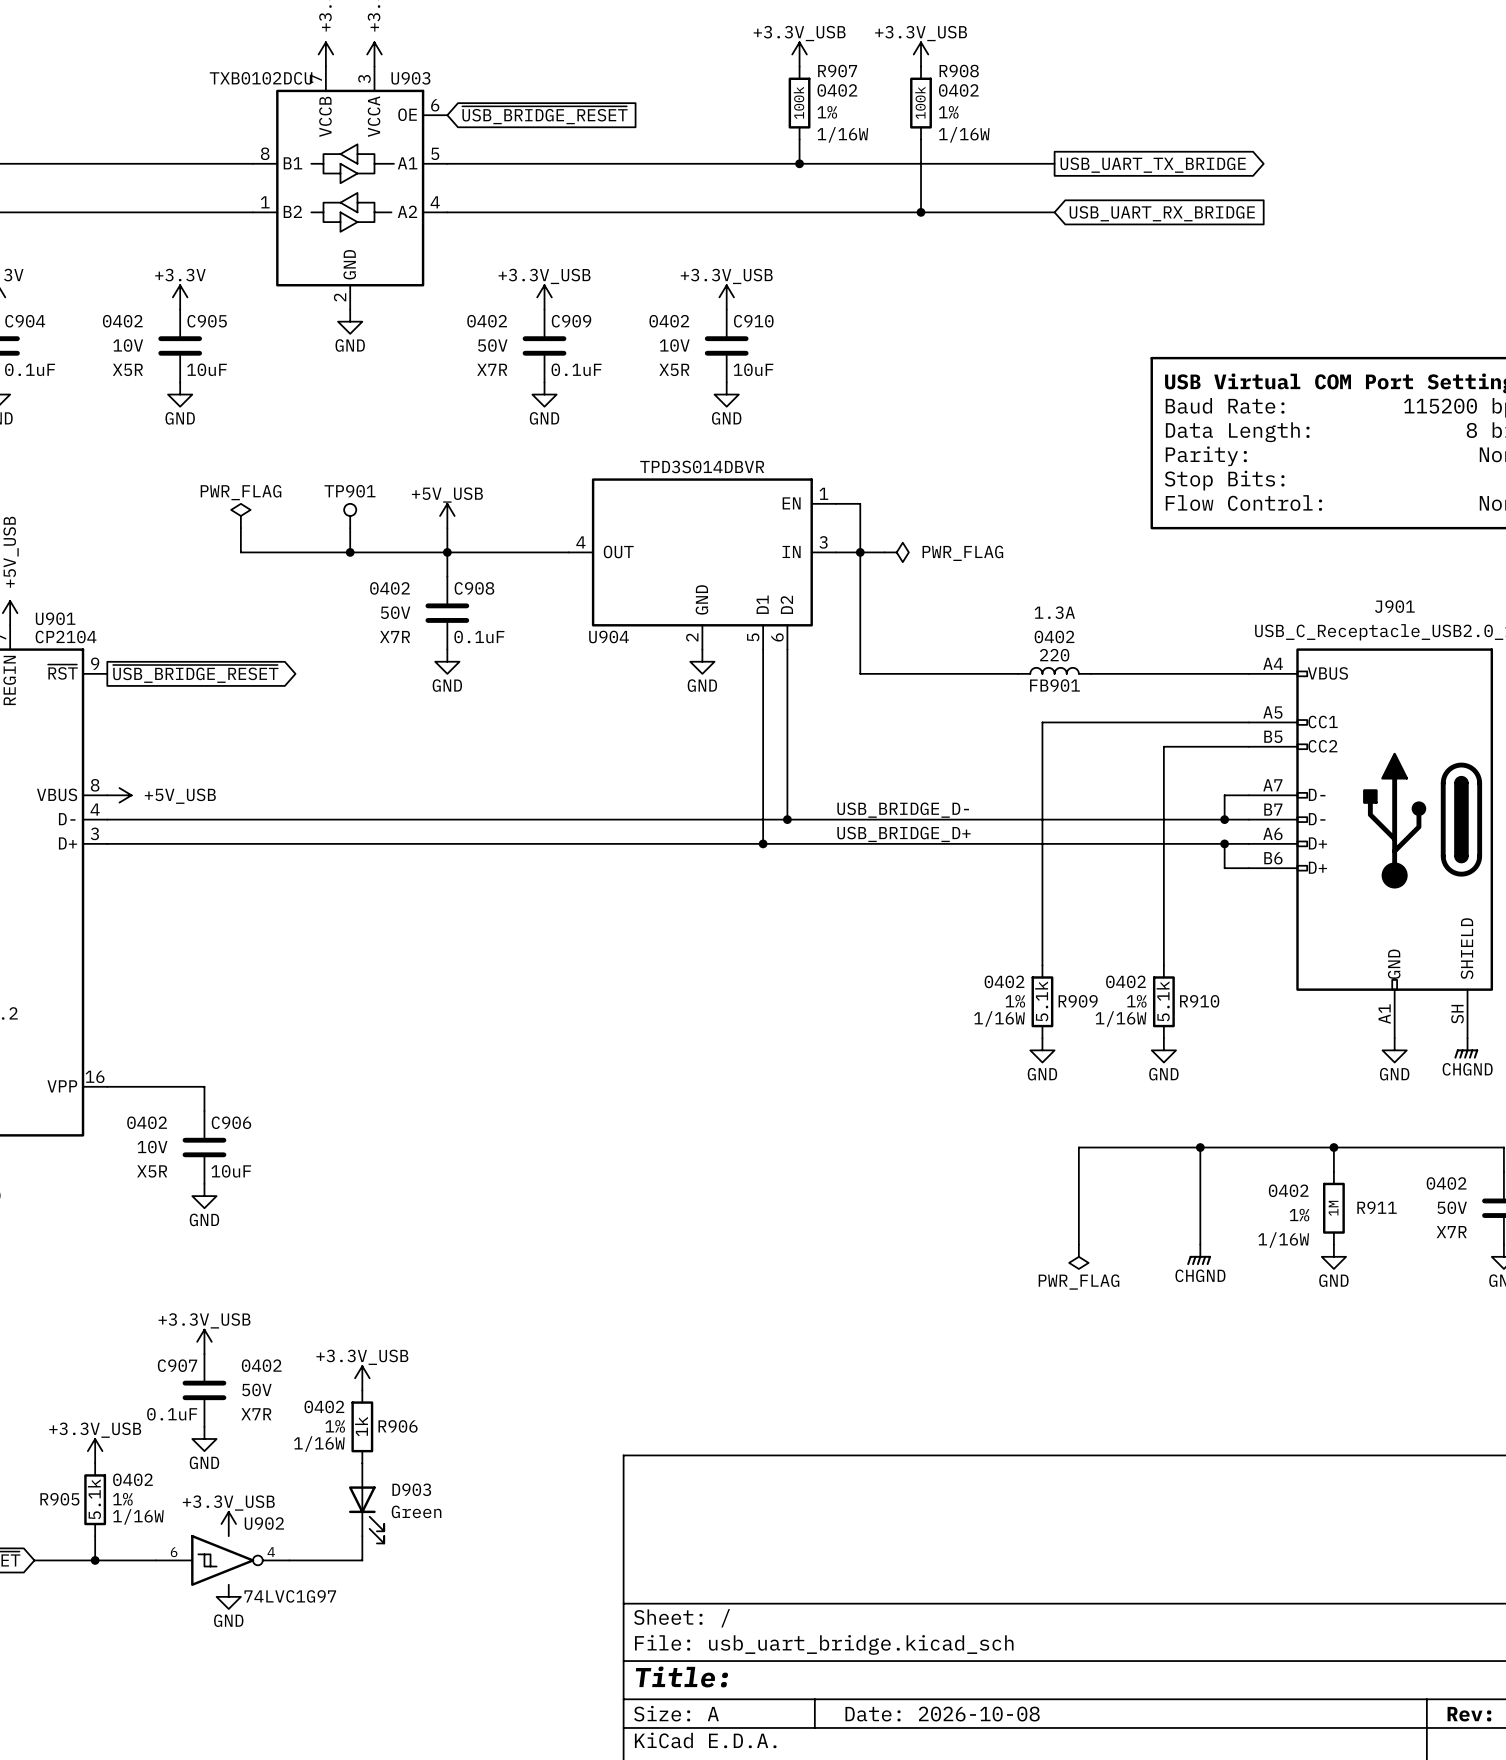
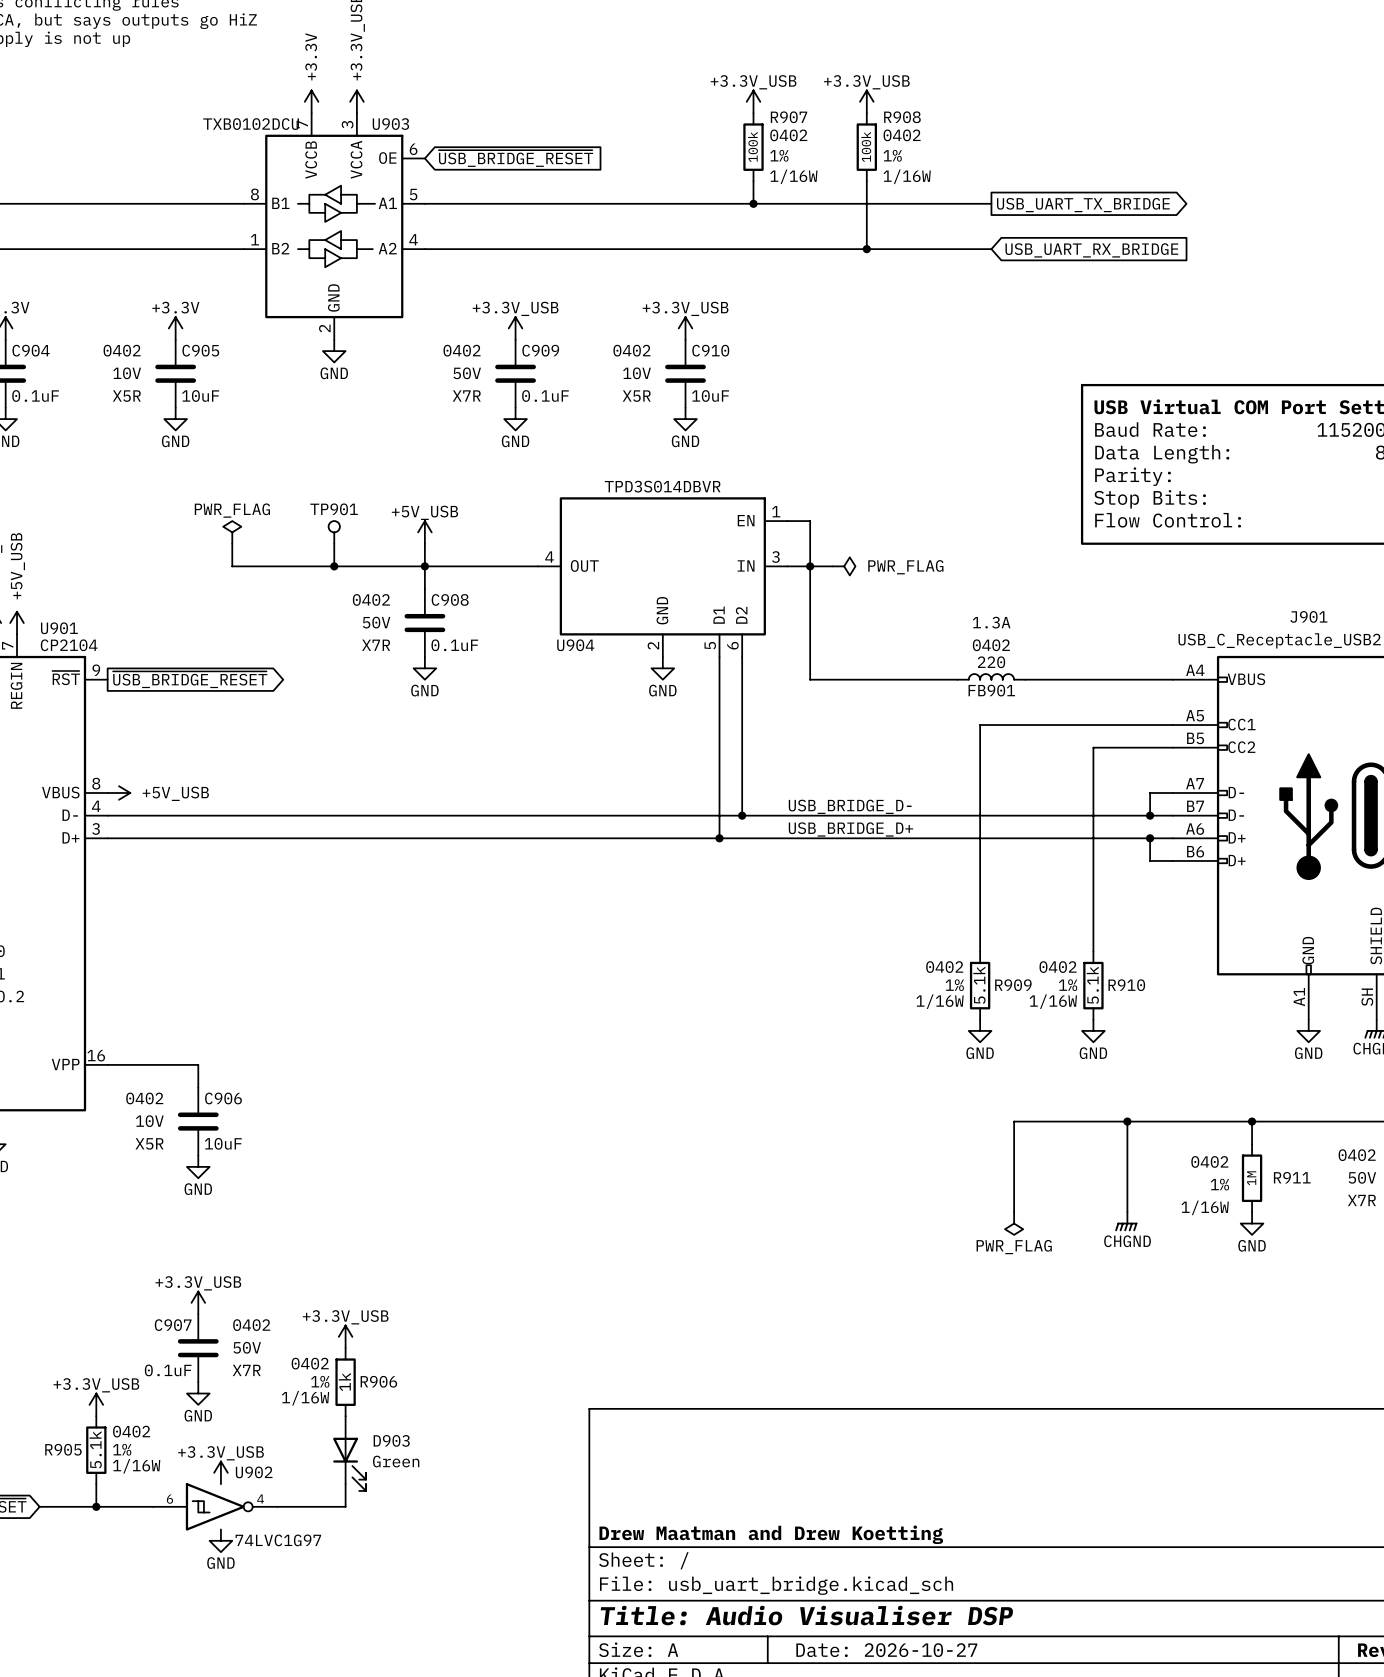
title block: none -> Drew Maatman and Drew Koetting (771, 1534)
title block: Title: (681, 1676) -> Title: Audio Visualiser DSP (806, 1615)
title block: Date: 2026-10-08 (942, 1714) -> Date: 2026-10-27 (886, 1650)

